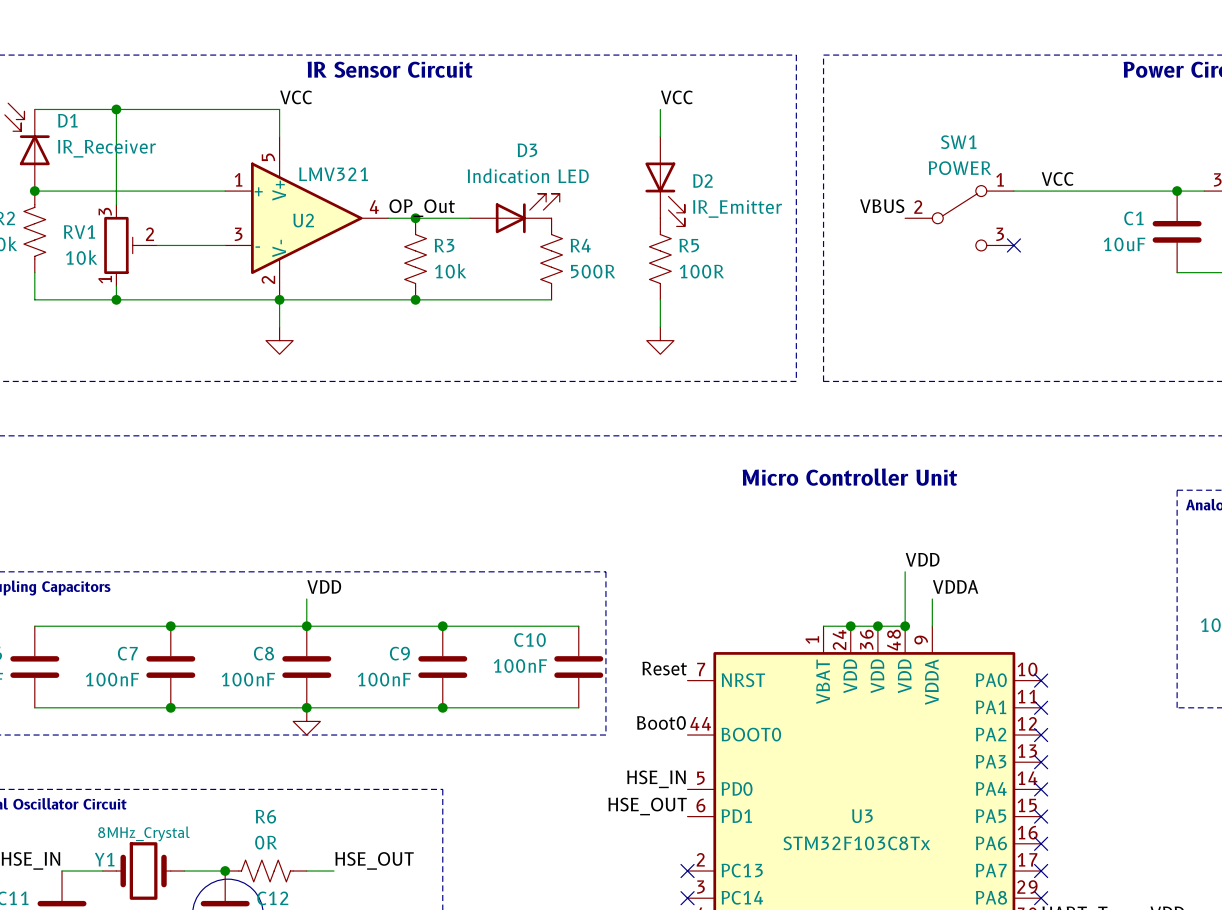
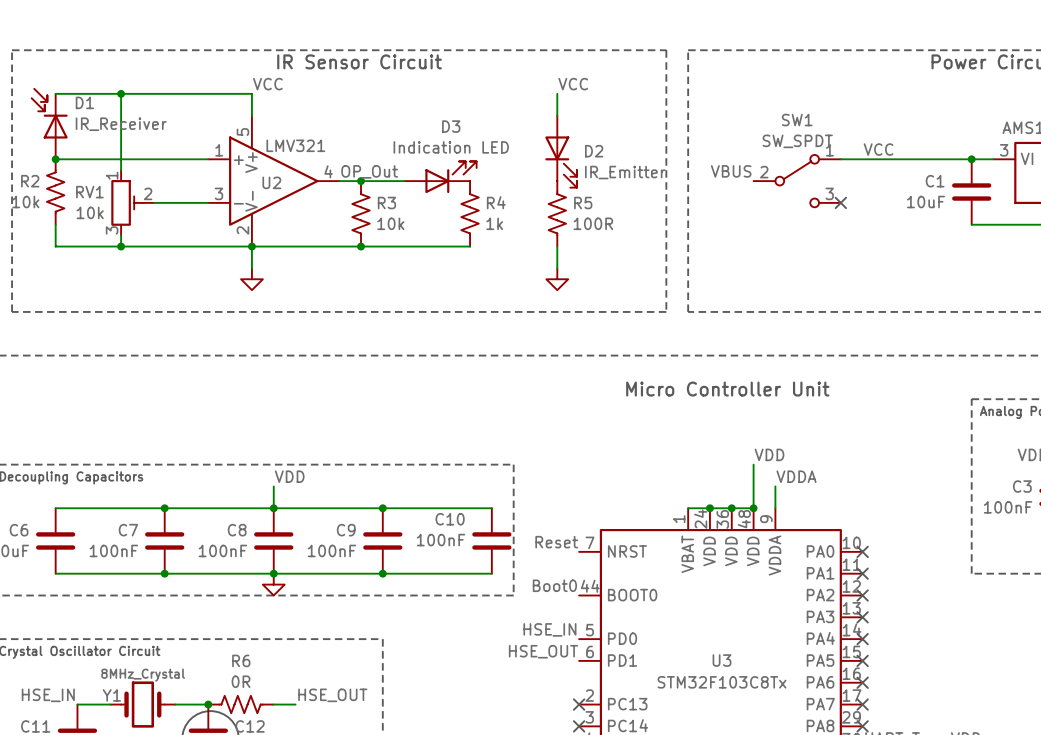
SW1 value: POWER (959, 168) -> SW_SPDT (797, 141)
RV1 flip: as is (123, 245) -> up-down (127, 202)
R4 value: 500R (593, 271) -> 1k (494, 223)

